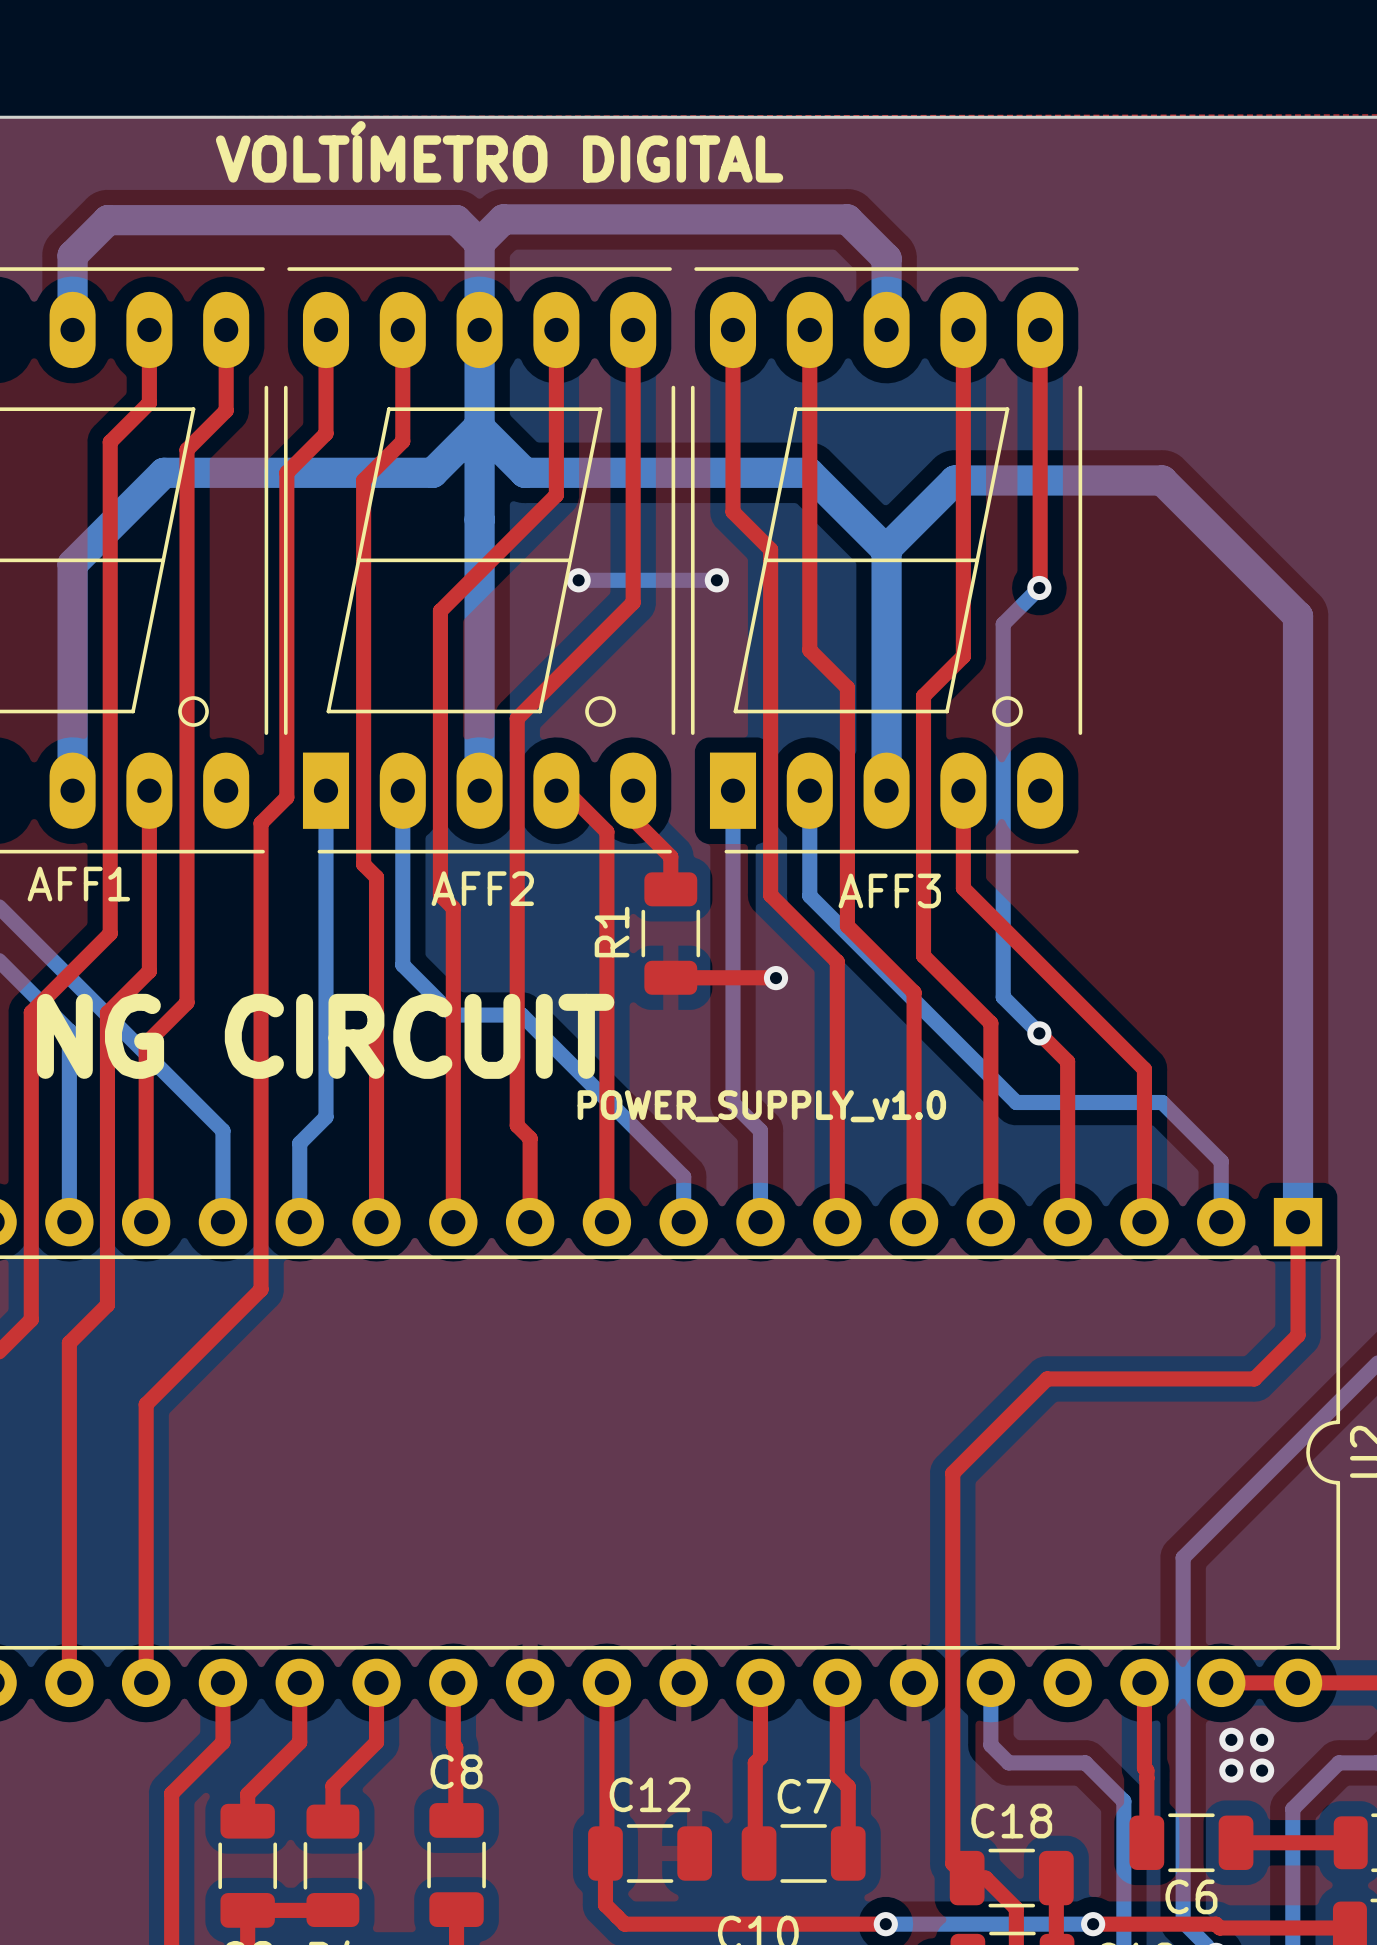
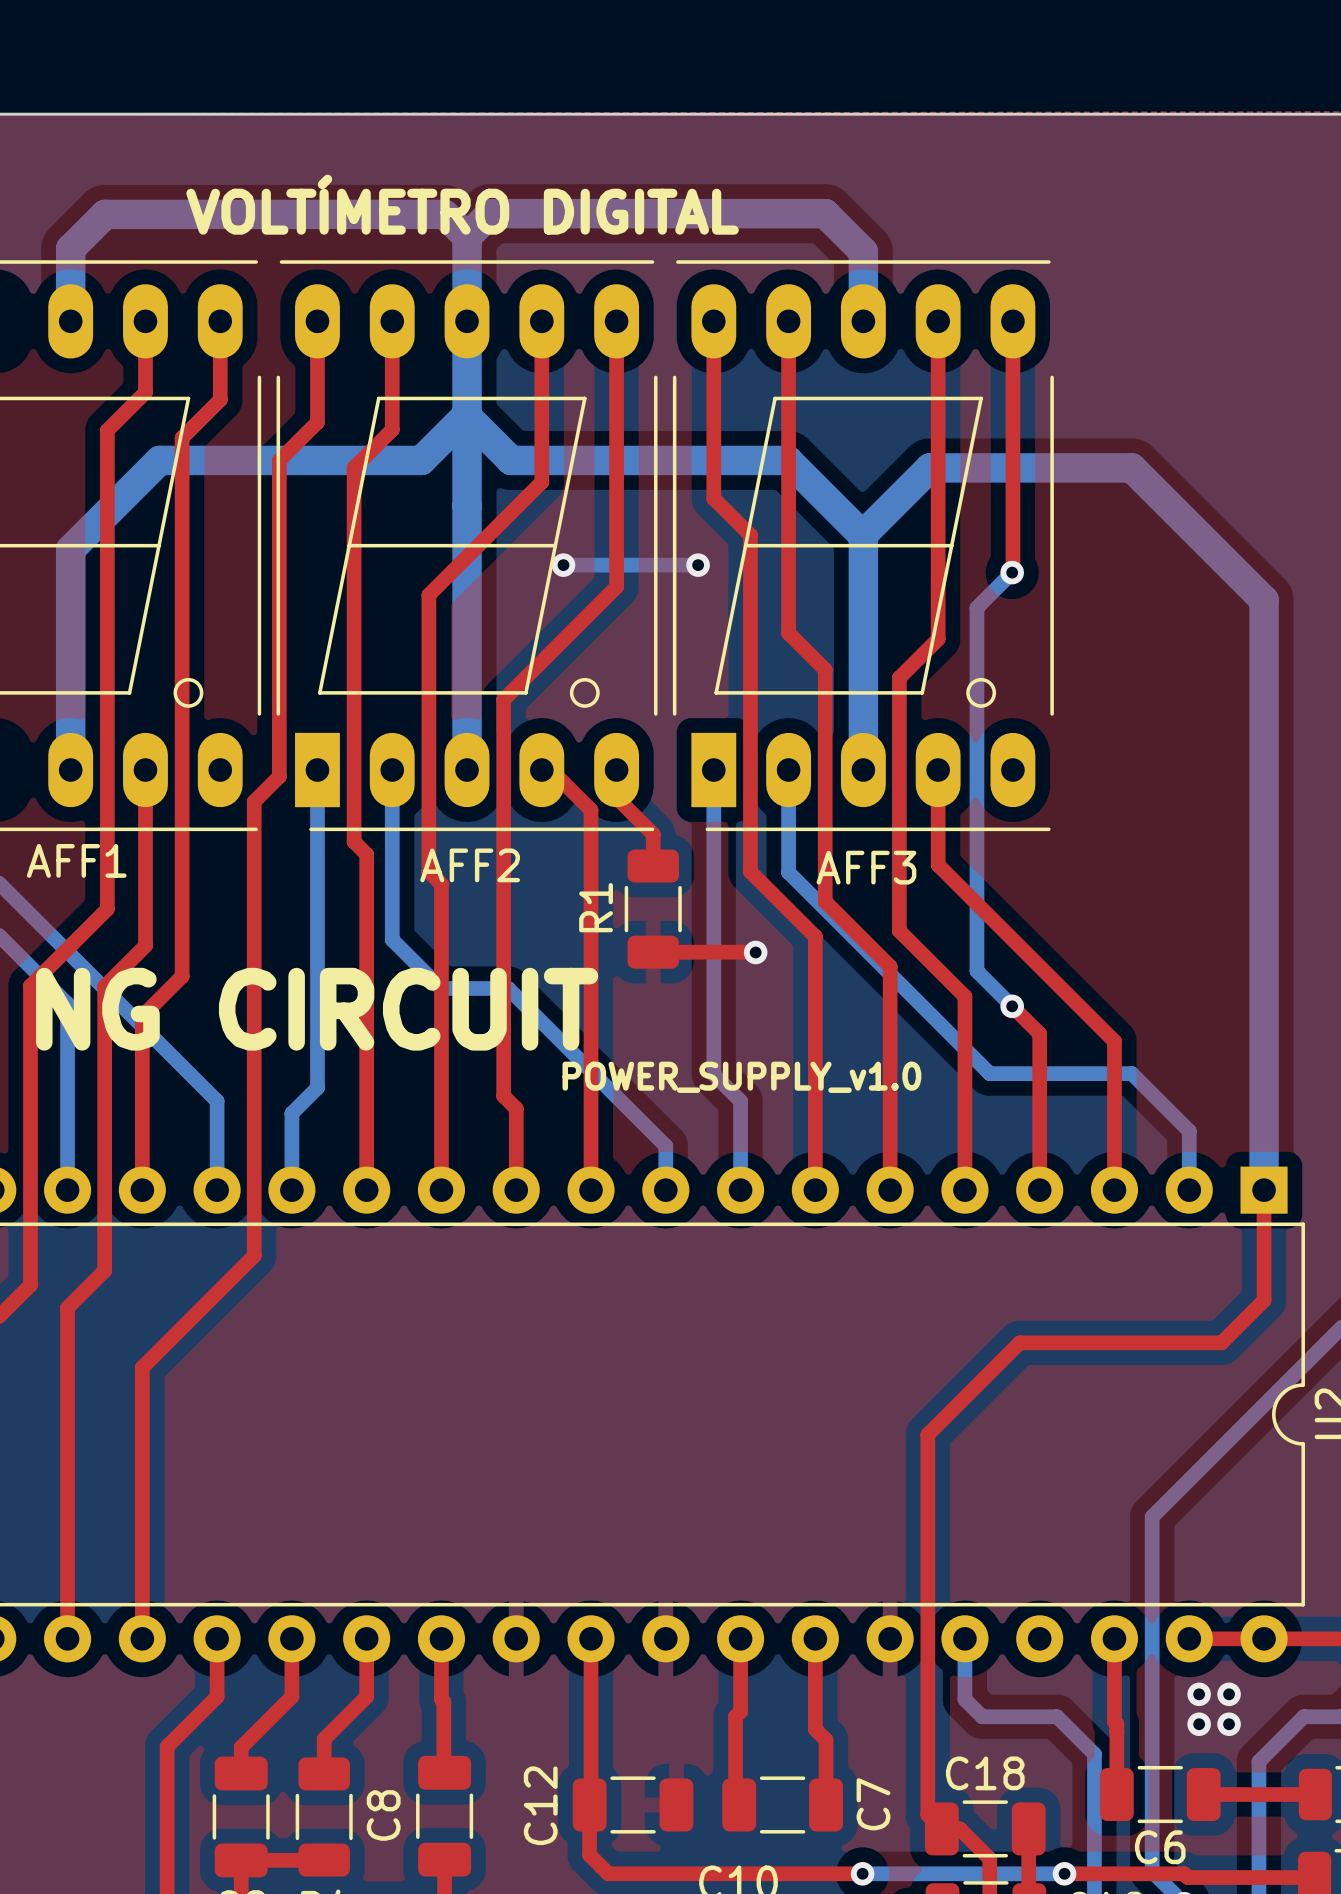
text position: VOLTÍMETRO DIGITAL (499, 151) -> VOLTÍMETRO DIGITAL (462, 204)
C8 name rotation: 0° (456, 1771) -> 90° counterclockwise (383, 1815)
C8 name position: C8 (456, 1771) -> C8 (383, 1815)
C12 name rotation: 0° (650, 1794) -> 90° counterclockwise (540, 1805)
C12 name position: C12 (650, 1794) -> C12 (540, 1805)
C7 name rotation: 0° (804, 1796) -> 90° counterclockwise (873, 1804)
C7 name position: C7 (804, 1796) -> C7 (873, 1804)

